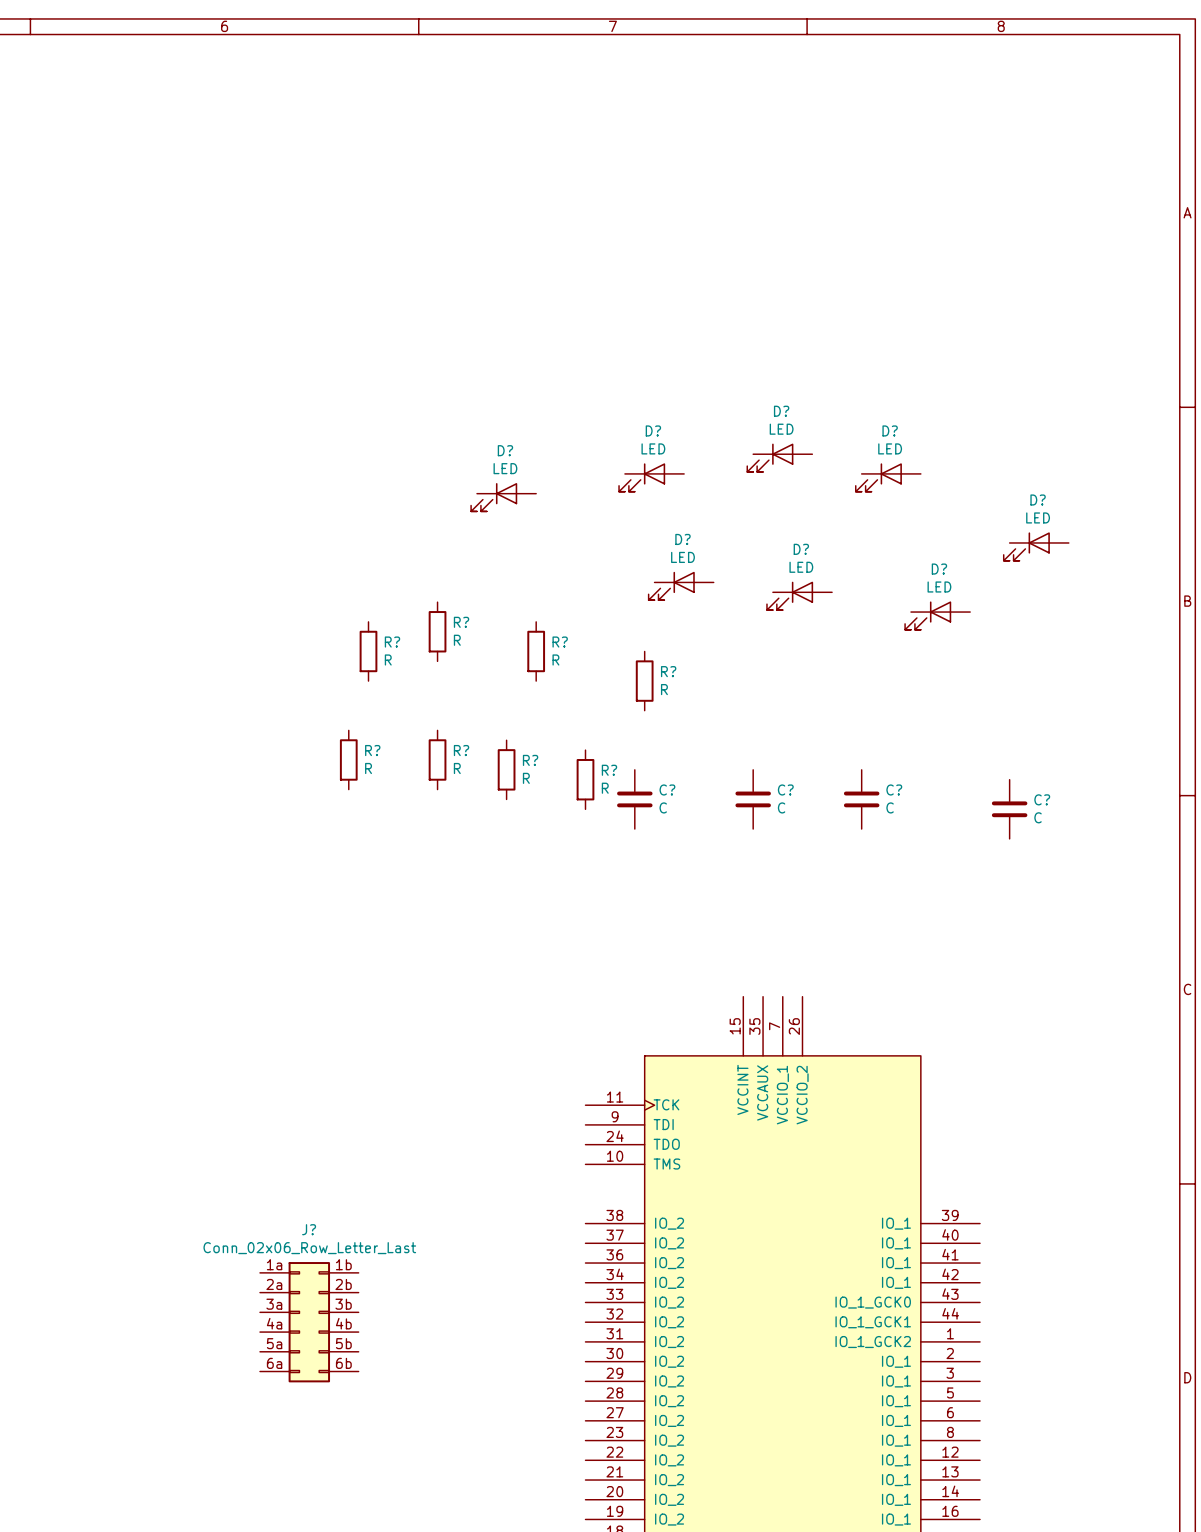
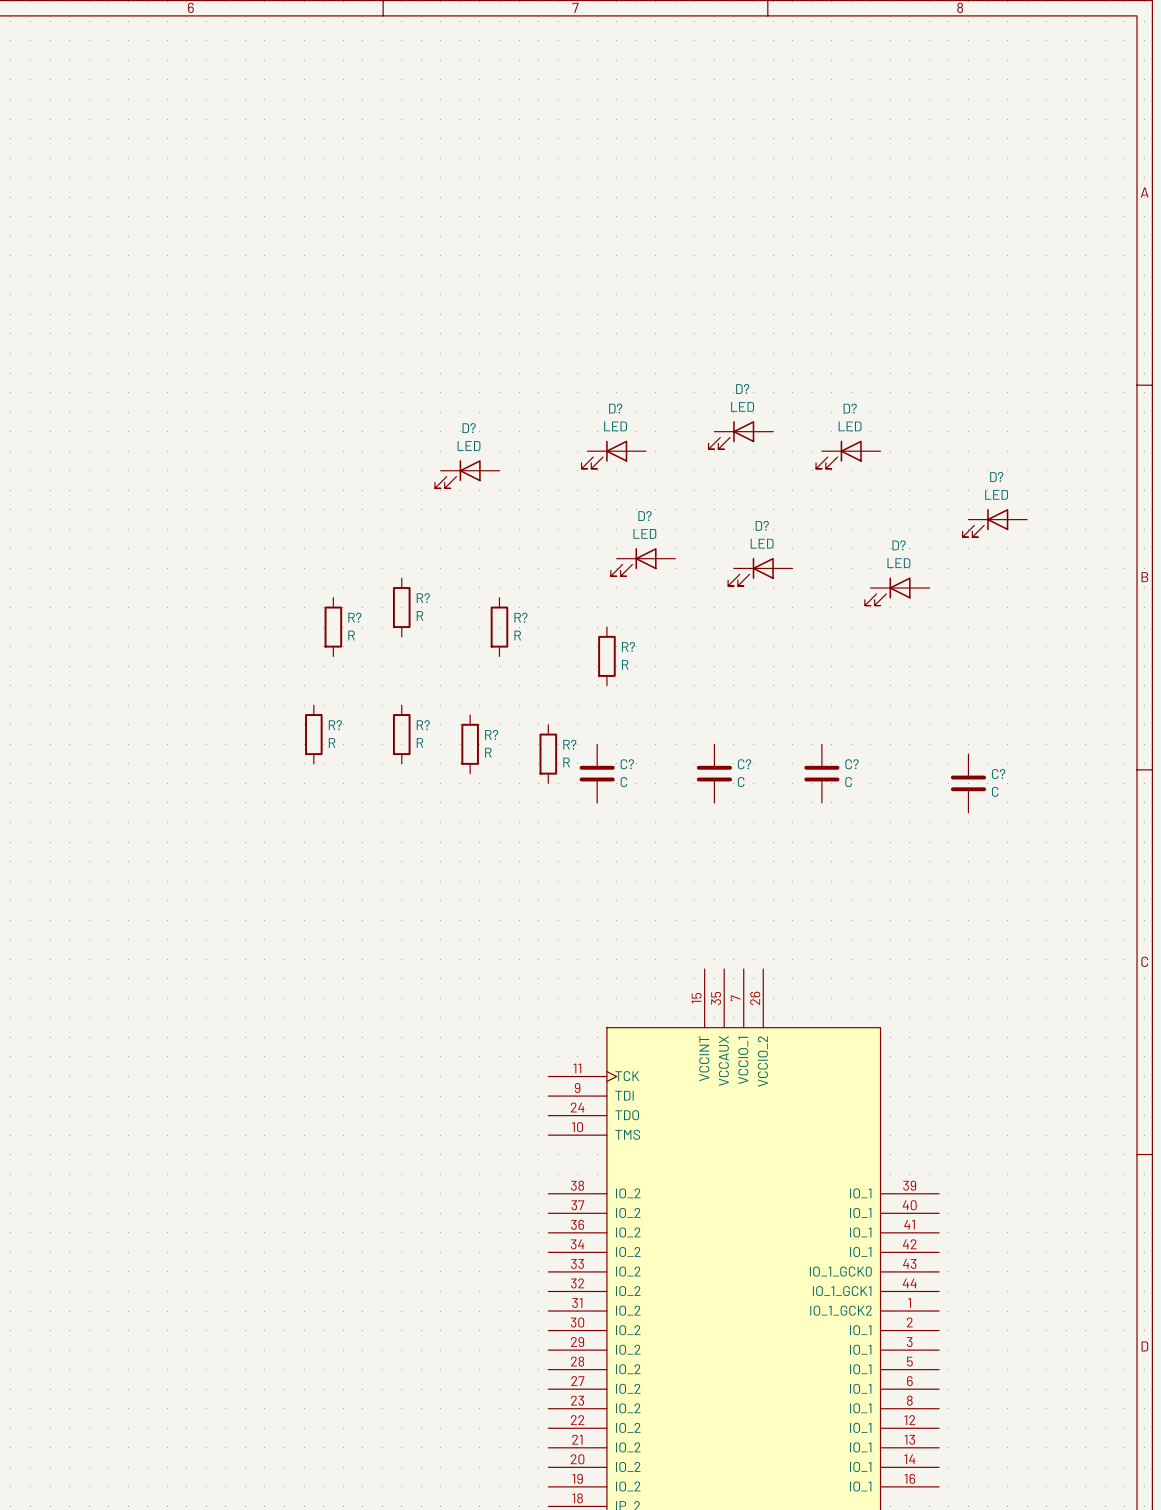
J?: Conn_02x06_Row_Letter_Last (309, 1322) -> none

